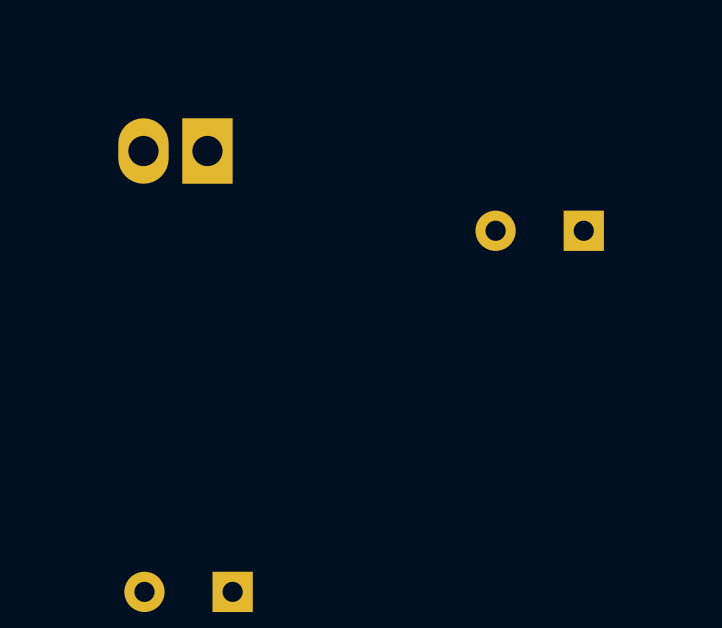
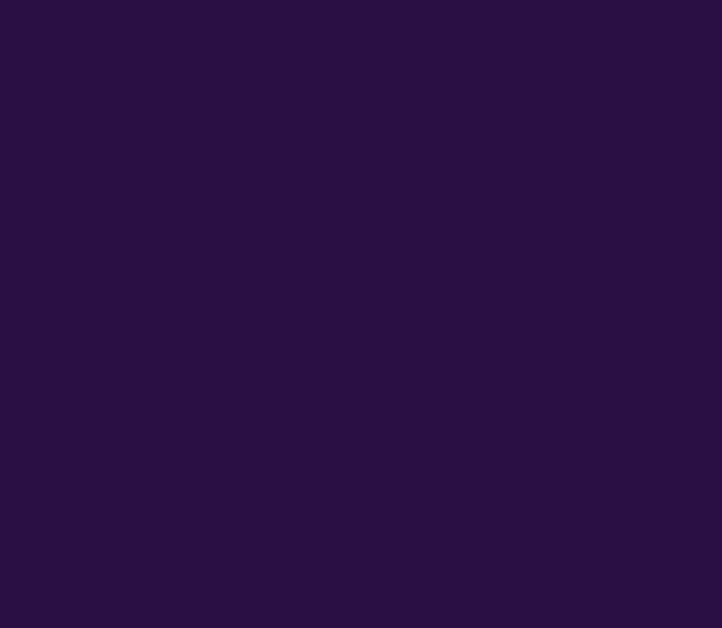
part: (175, 151) -> none
part: (539, 230) -> none
part: (188, 591) -> none

